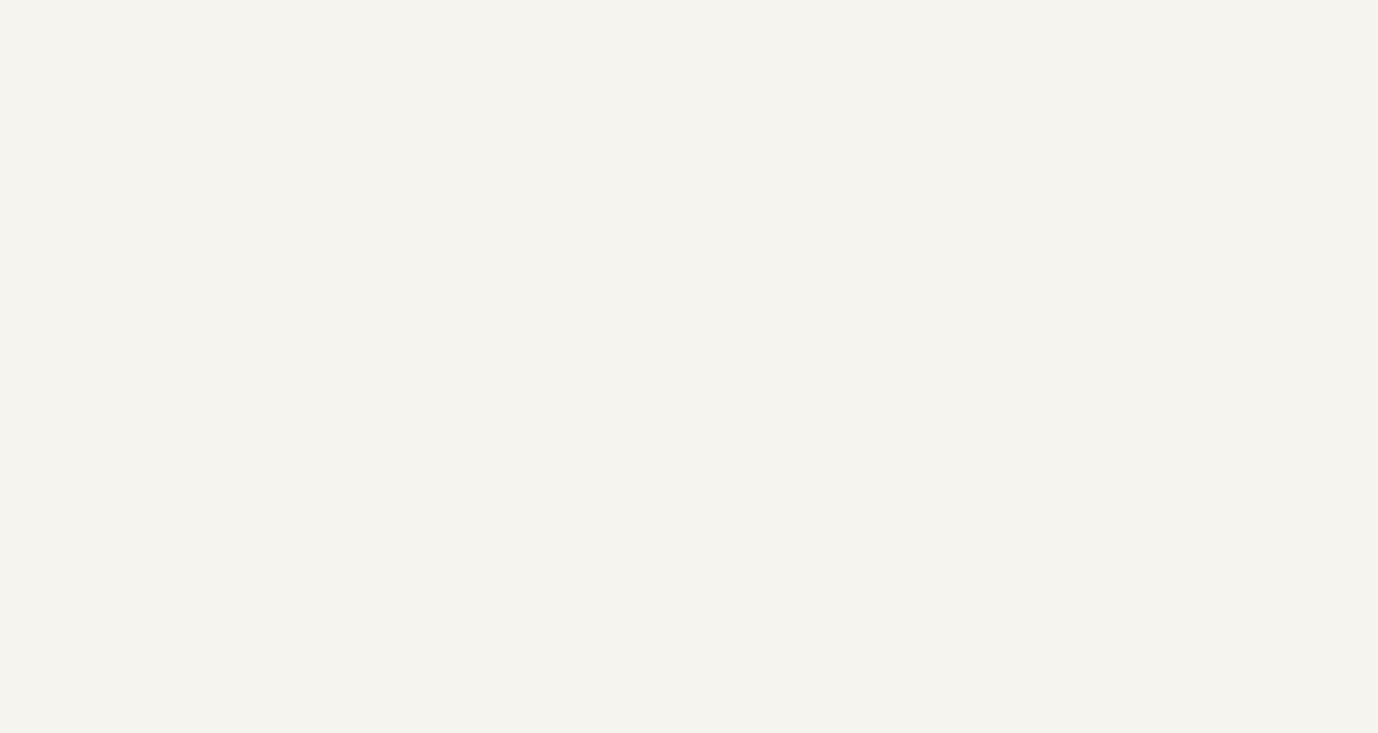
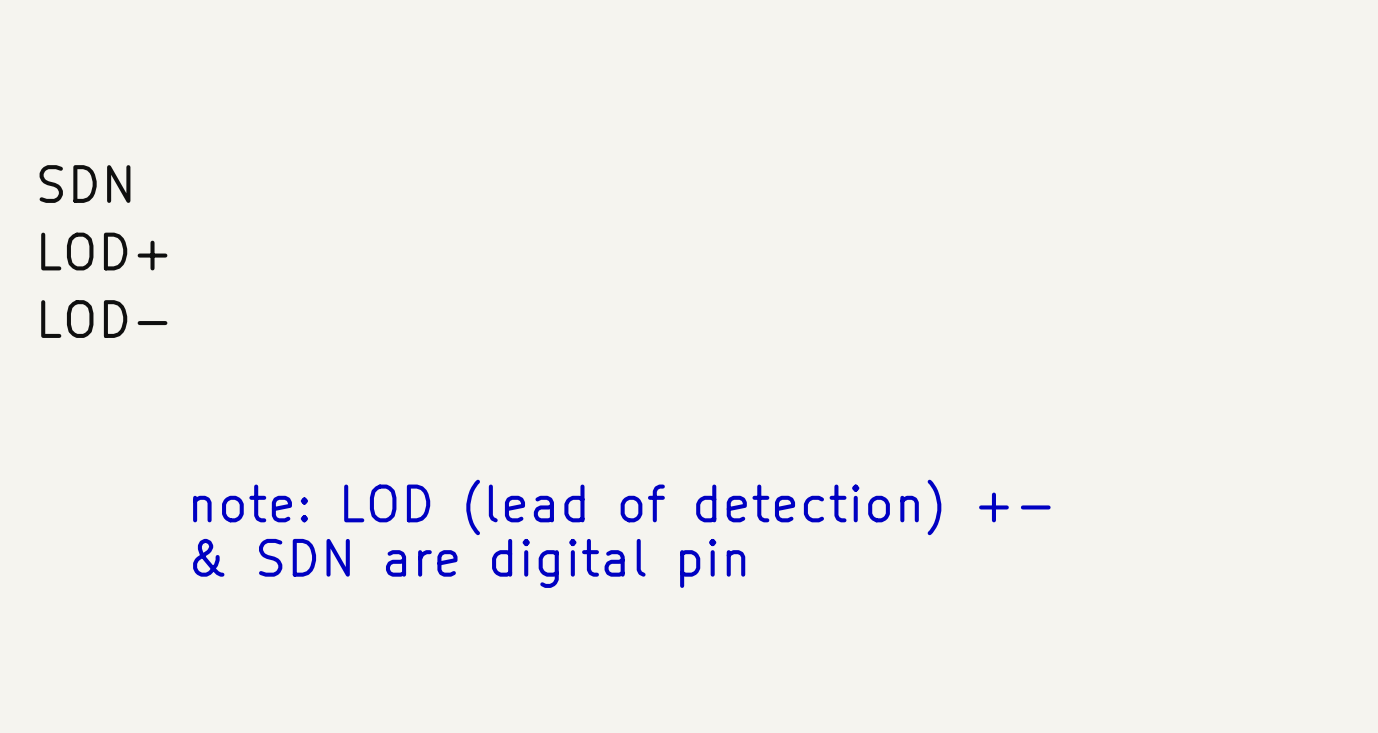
label: none -> SDN (85, 184)
label: none -> LOD+ (104, 251)
label: none -> LOD- (104, 319)
text: none -> note: LOD (lead of detection) +- (621, 507)
text: none -> & SDN are digital pin (469, 563)

